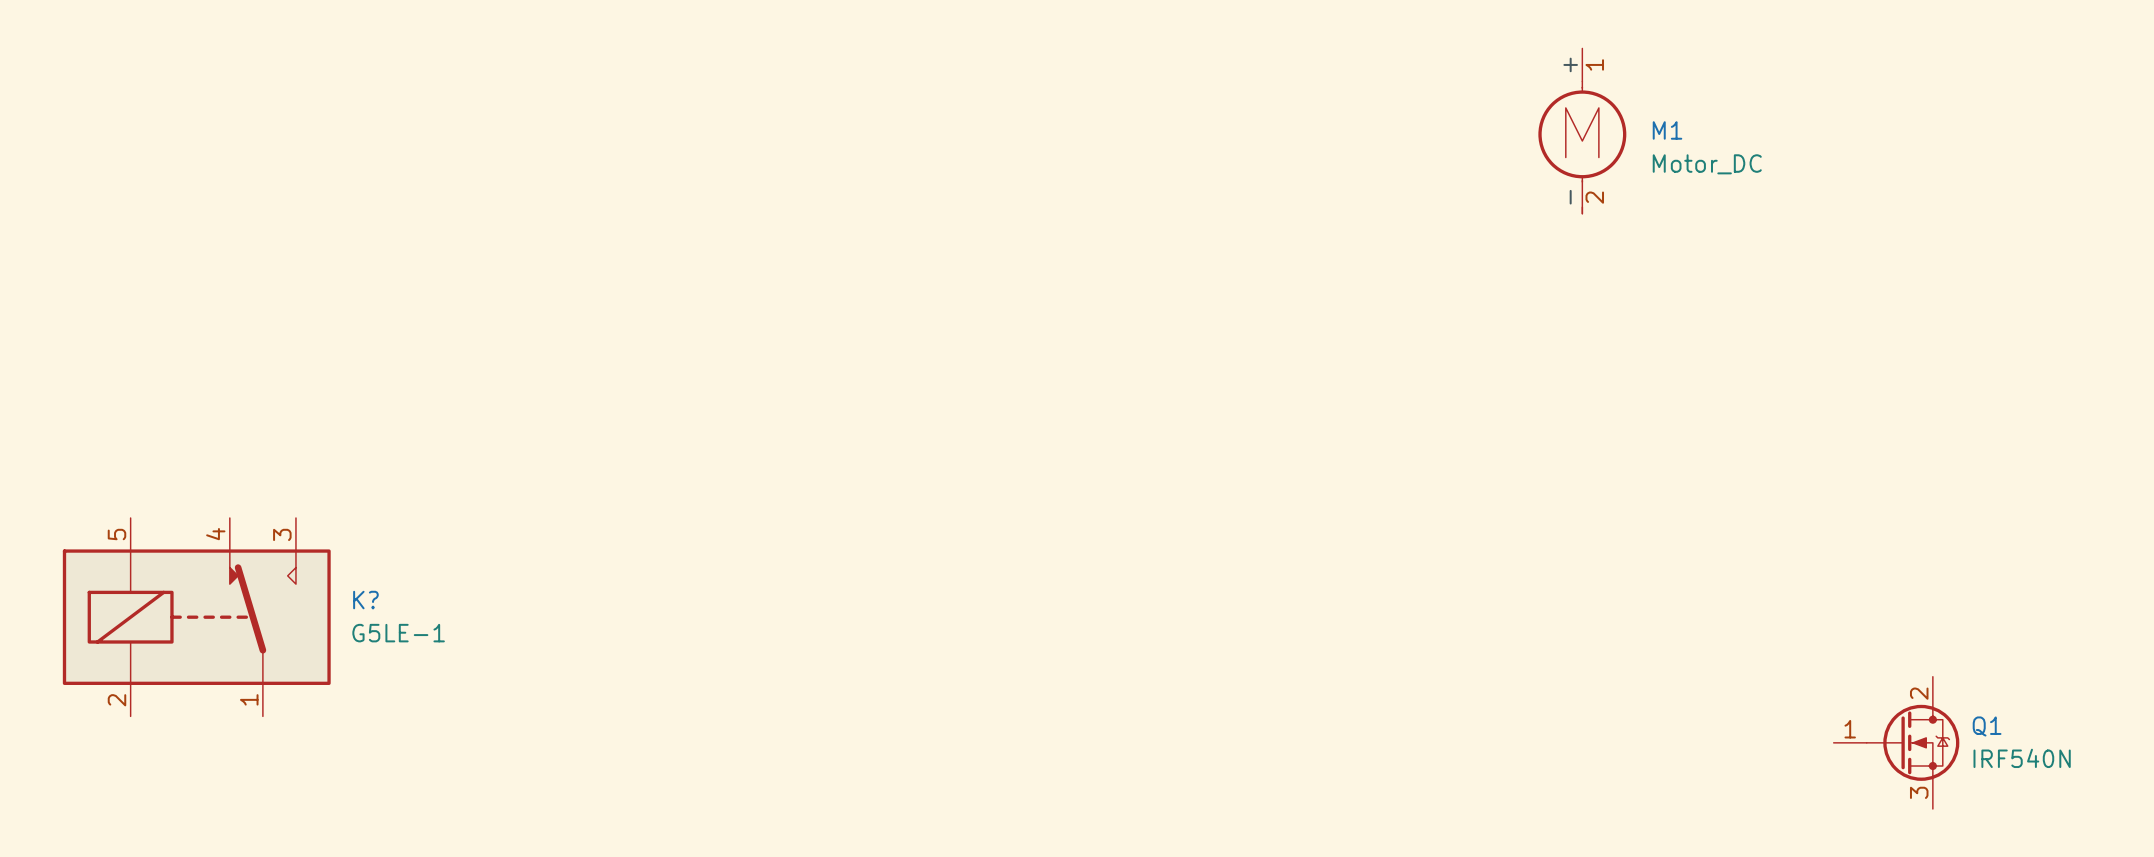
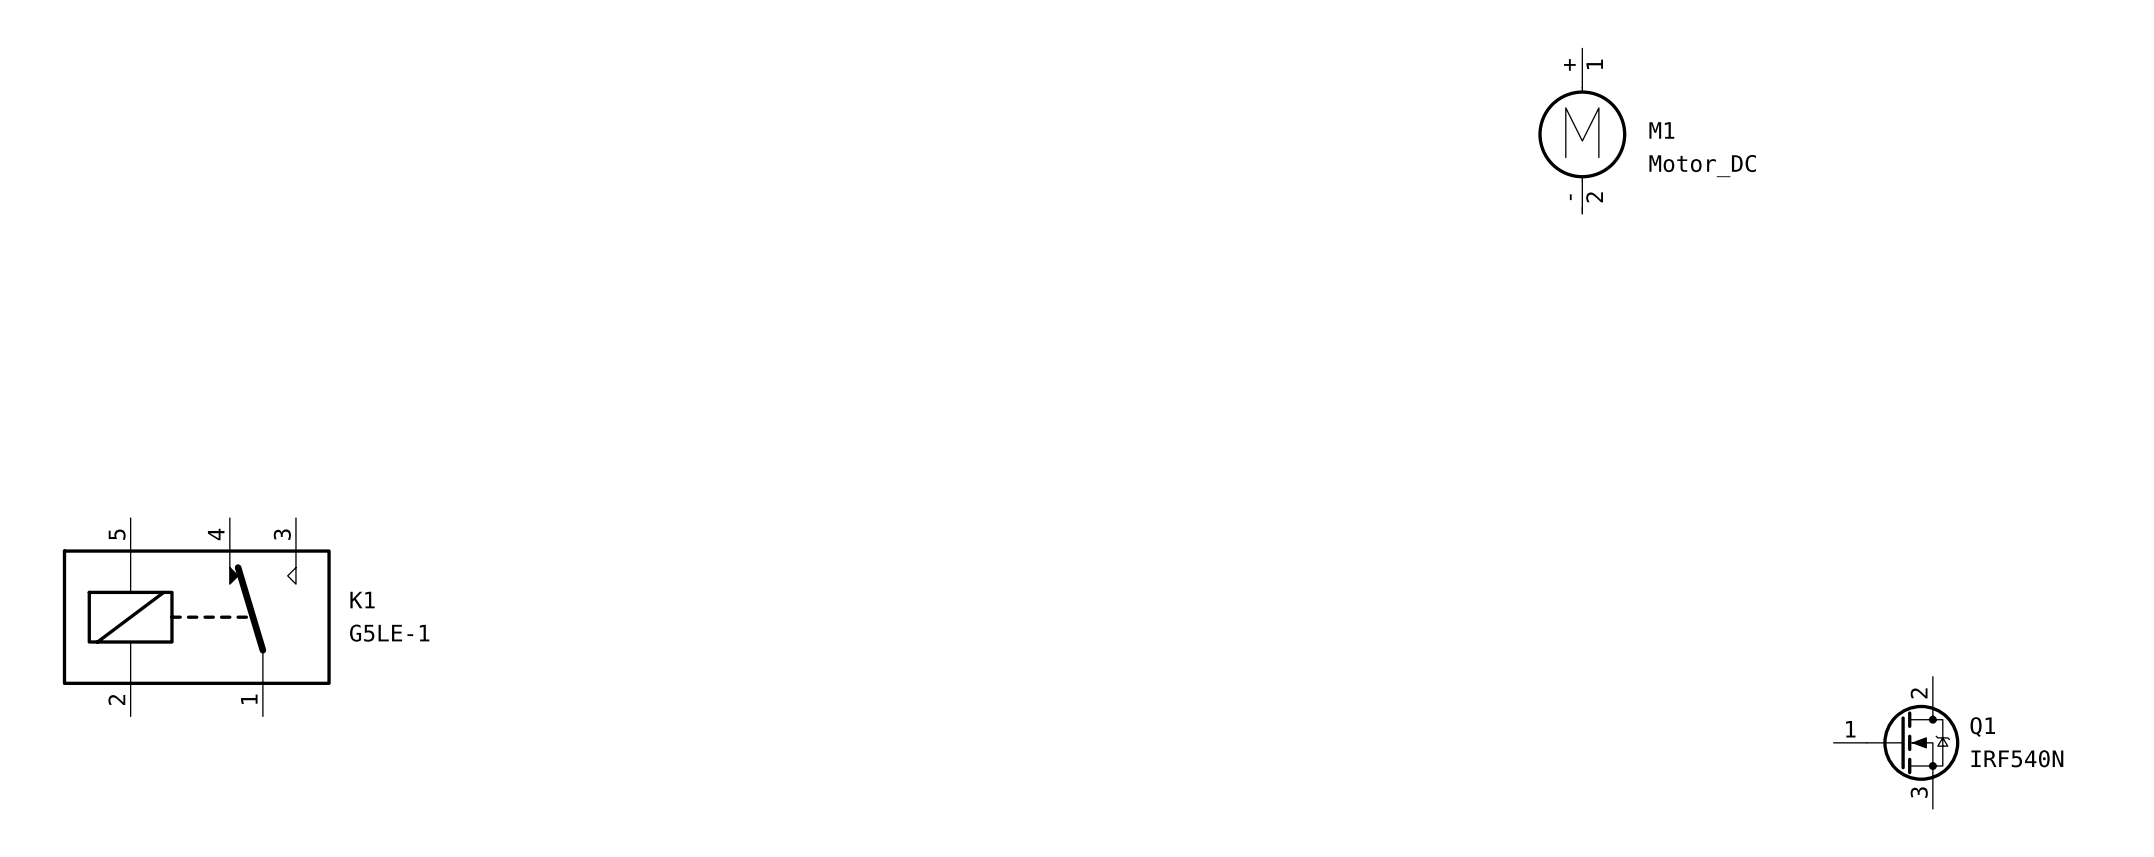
K? name: K? (365, 600) -> K1 (362, 600)

